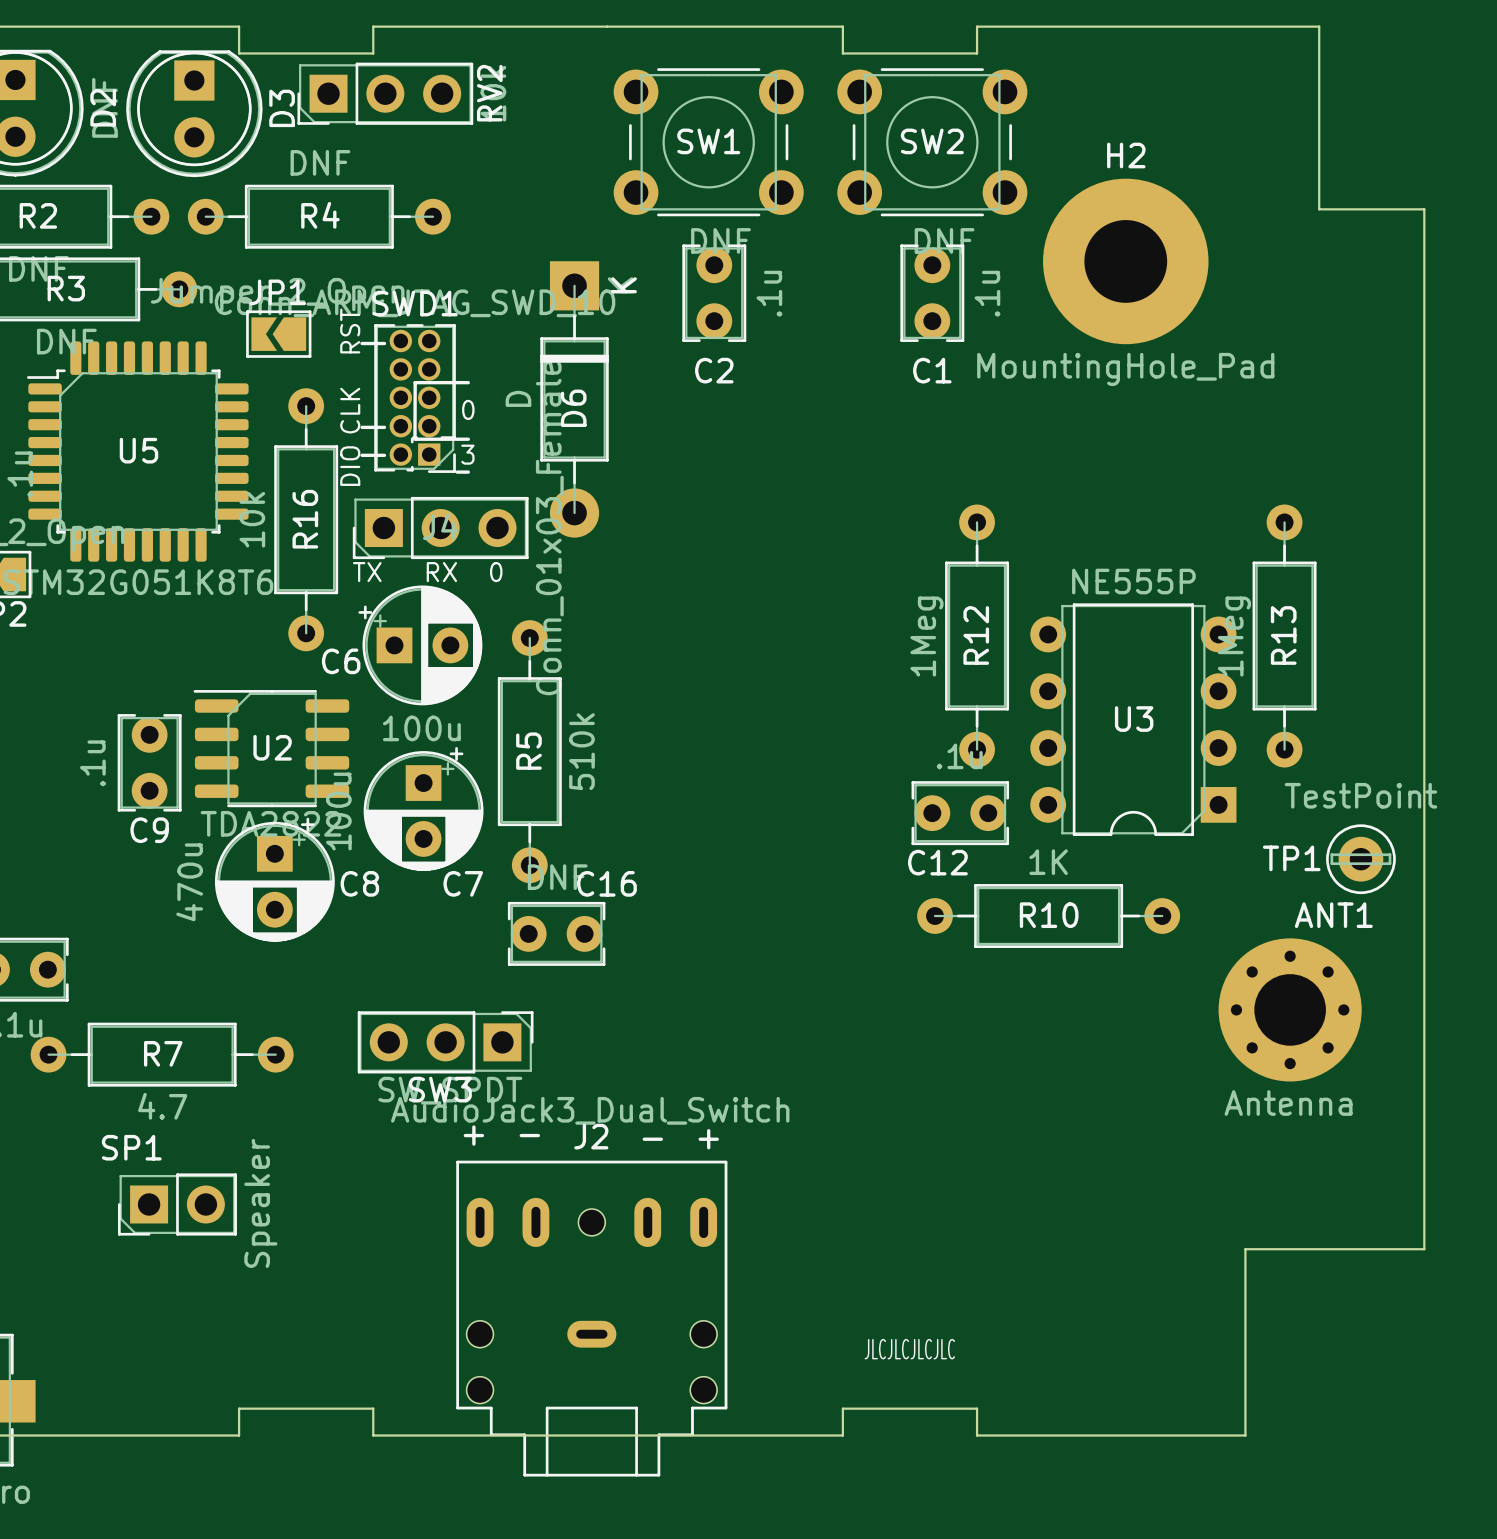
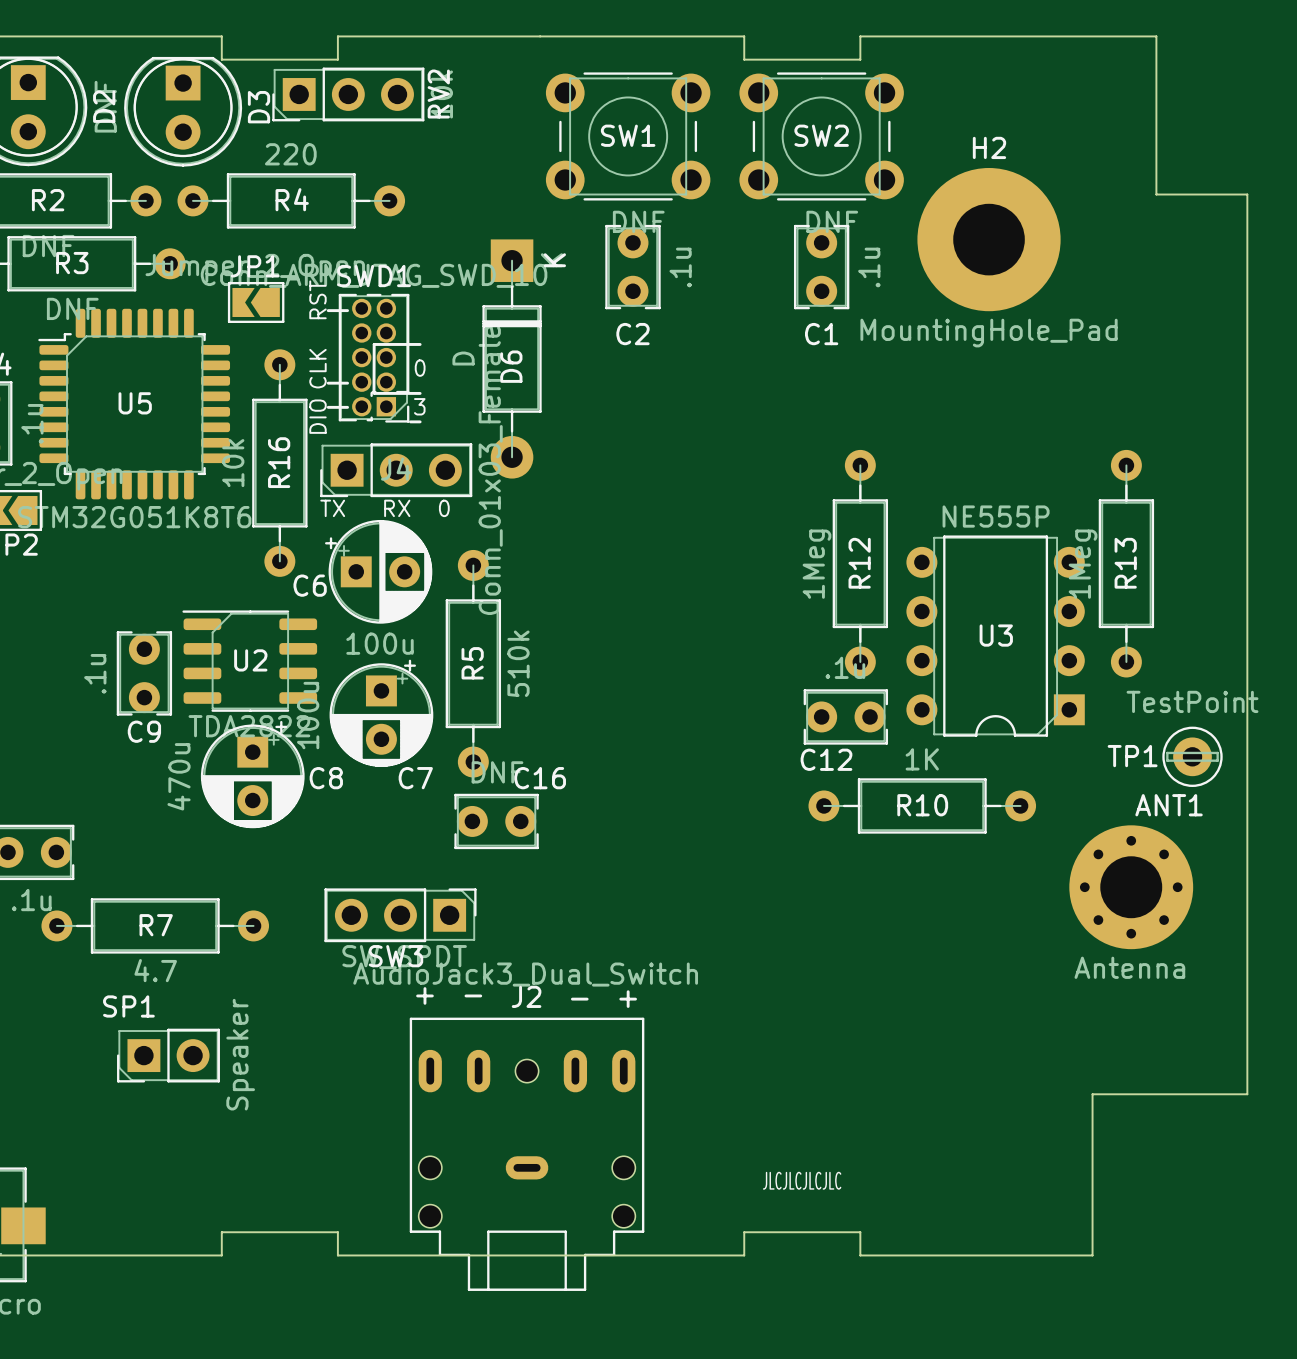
R4 value: DNF (320, 162) -> 220 (290, 154)

